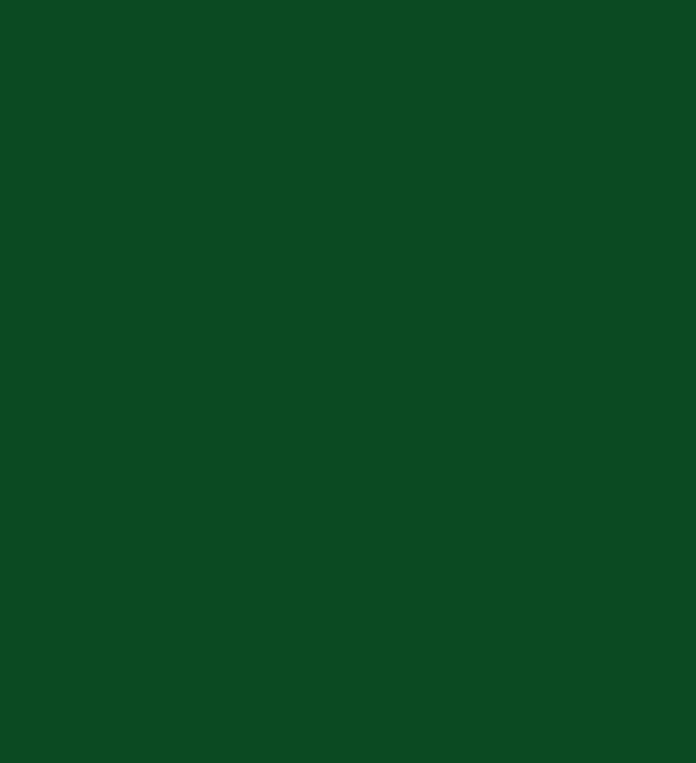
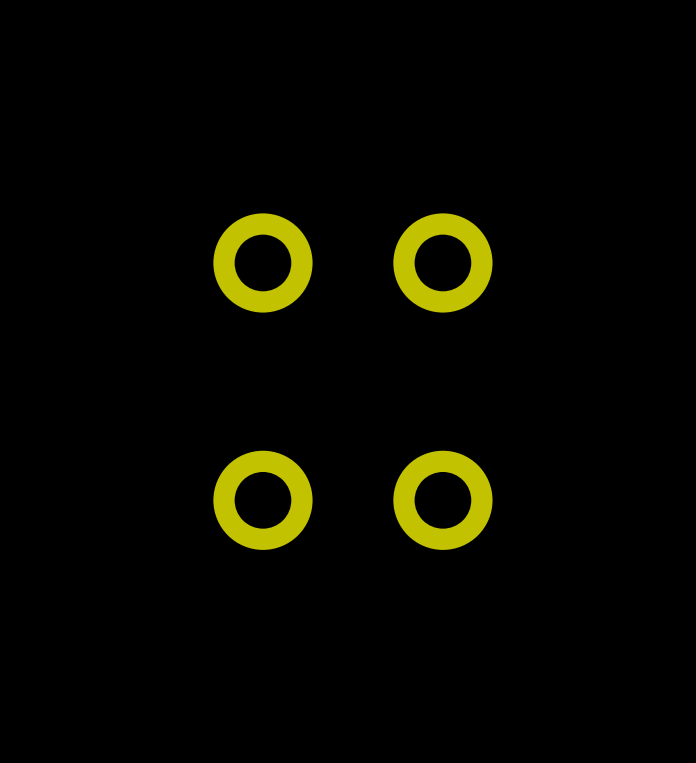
part: none -> (352, 262)
part: none -> (352, 500)

